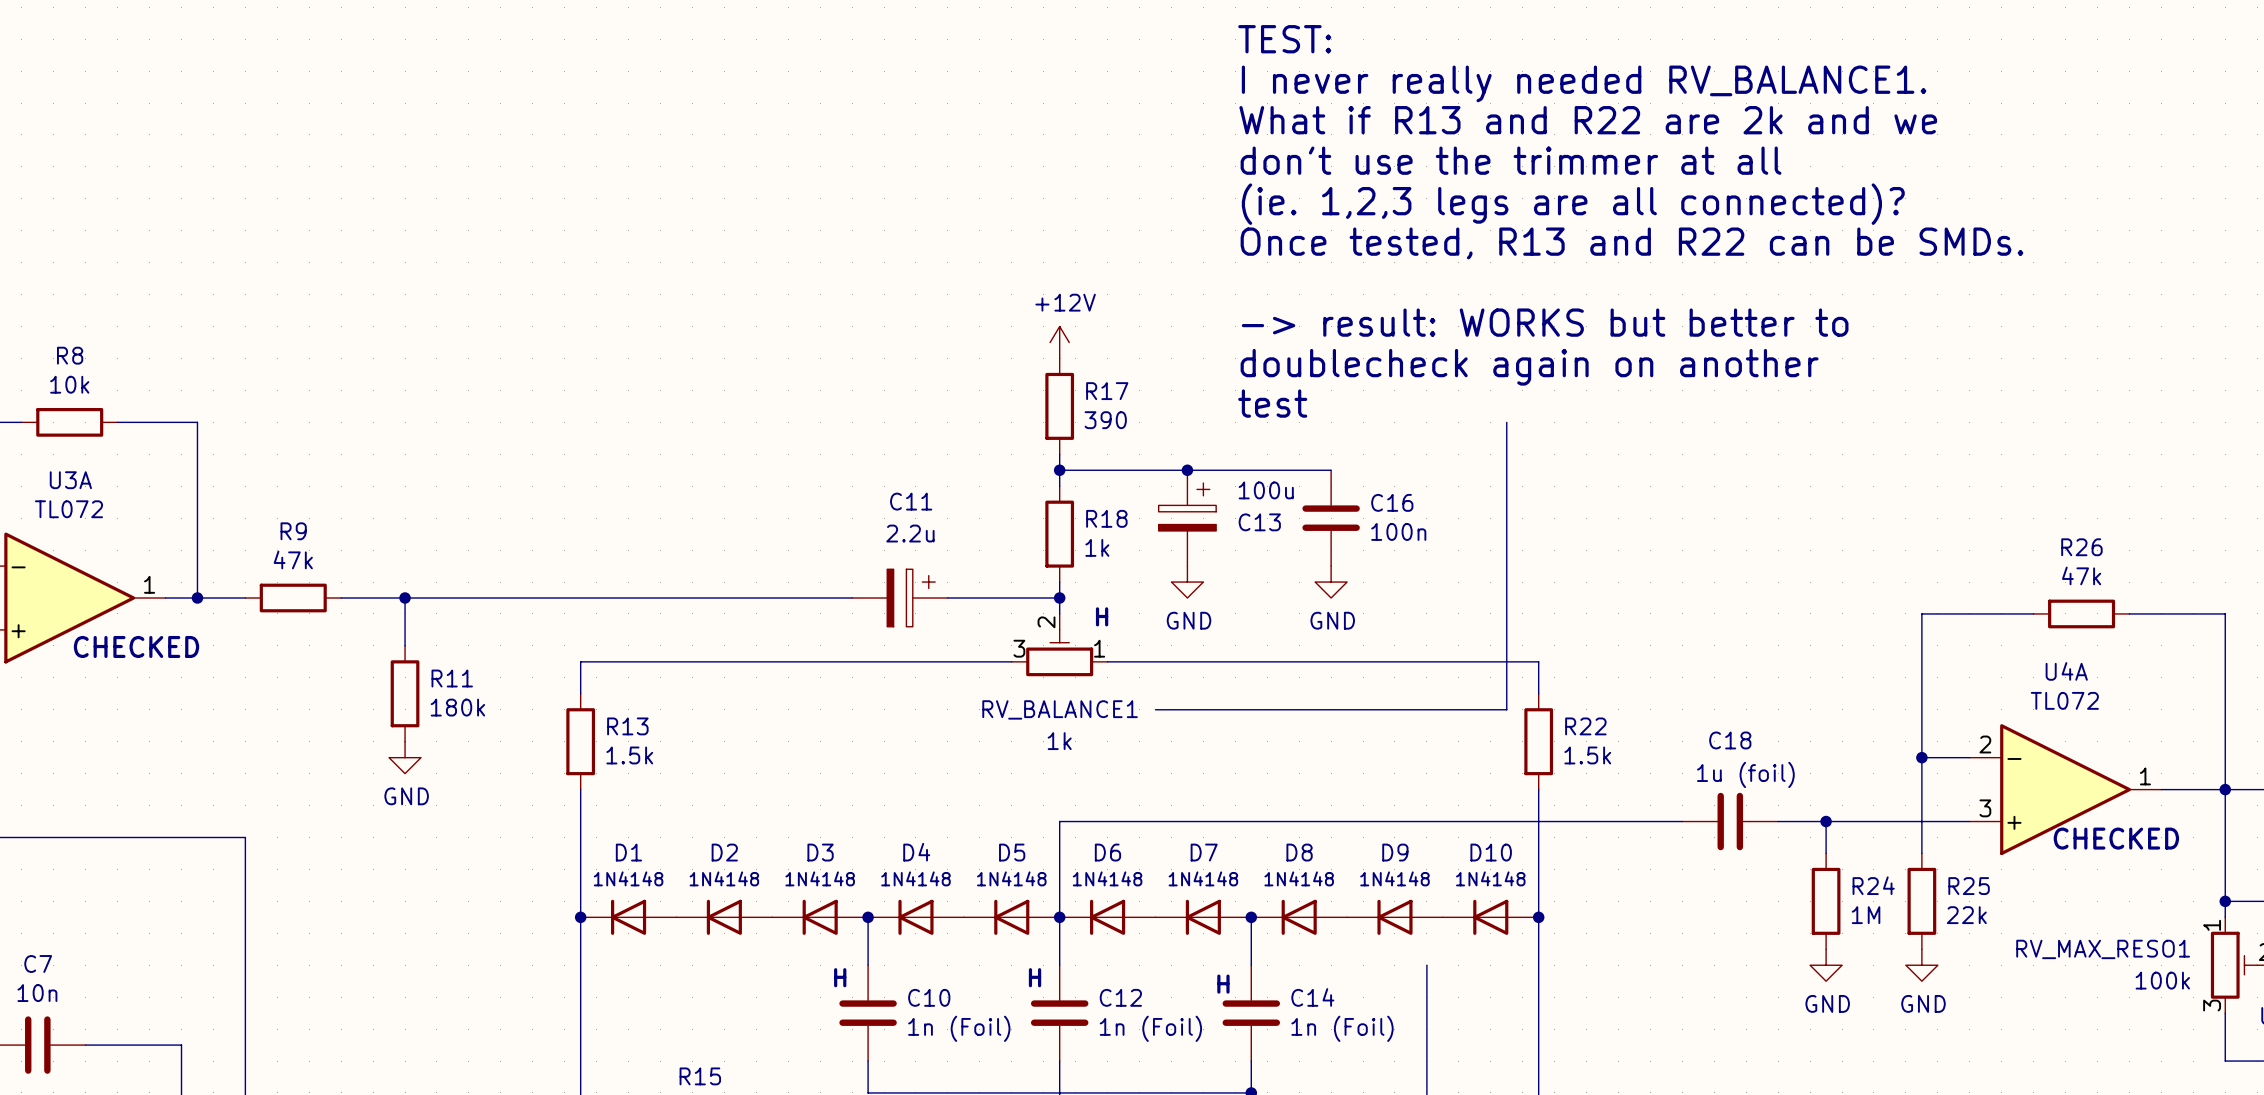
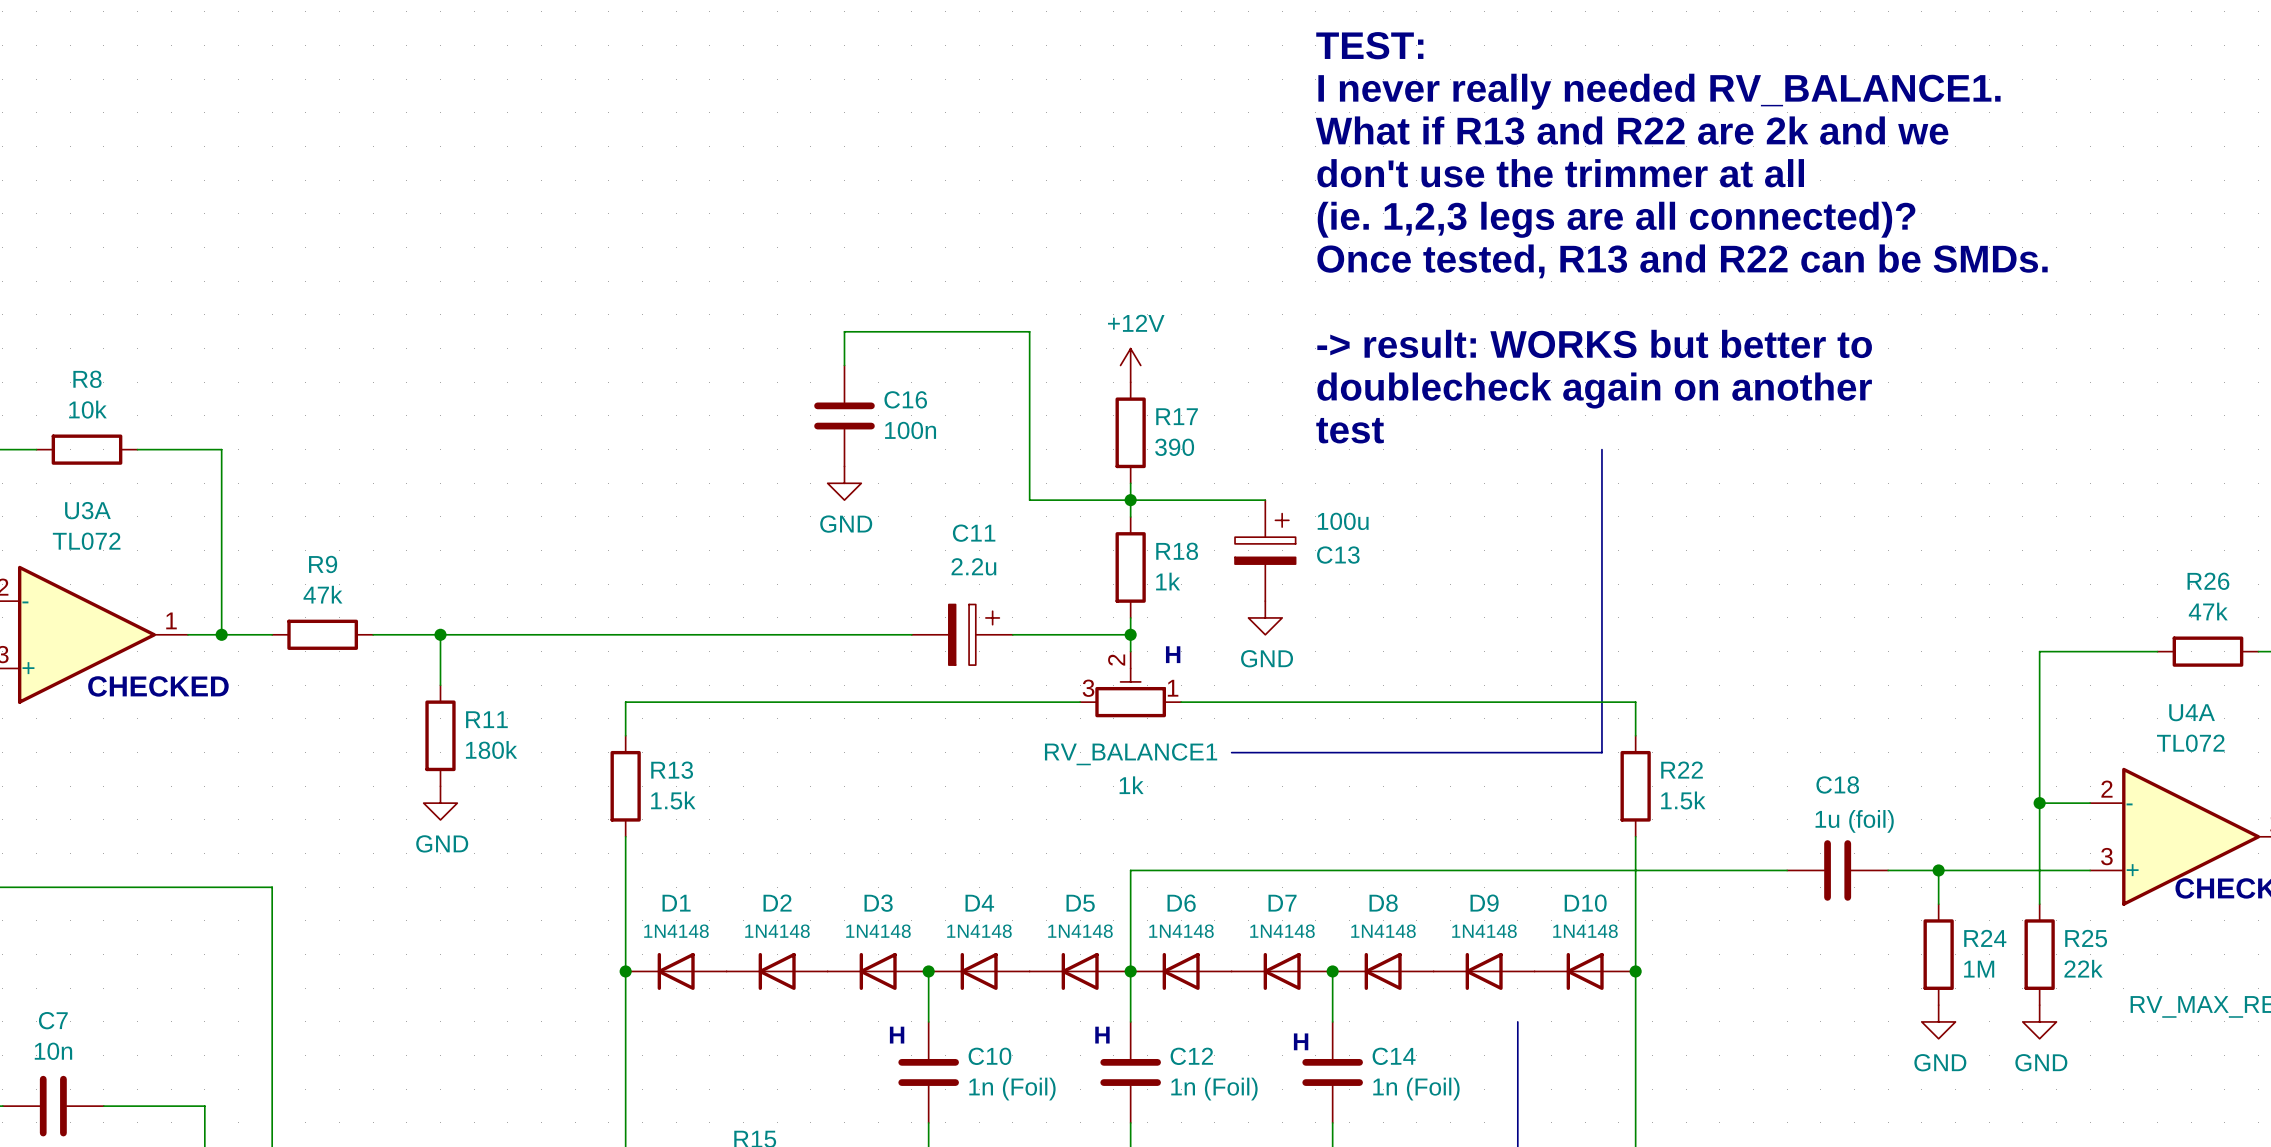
wire: none -> (844, 365) (844, 331) (1029, 331) (1029, 500) (1130, 500)
power symbol: none -> GND (844, 483)
wire: (1187, 470) (1331, 470) -> none
junction: (1187, 470) -> none
C16 position: (1331, 518) -> (844, 415)
power symbol: GND (1331, 582) -> none

